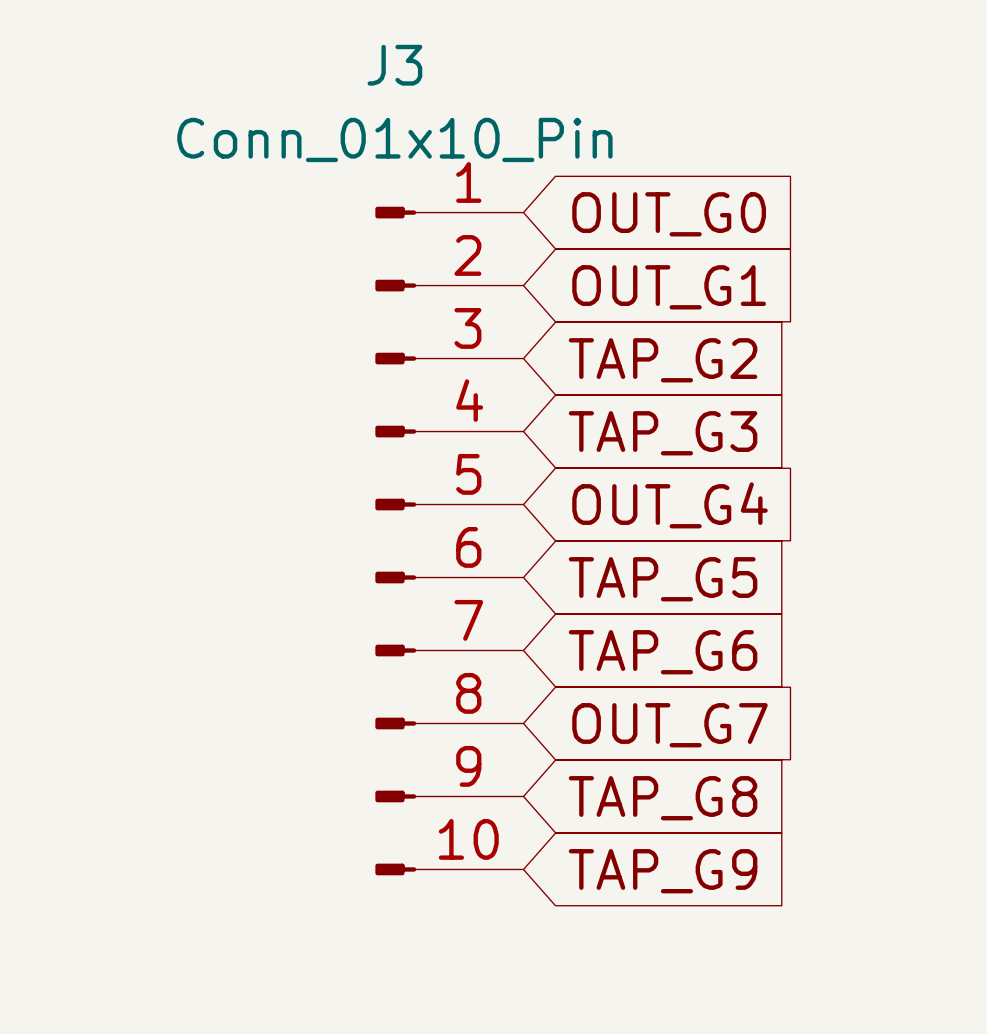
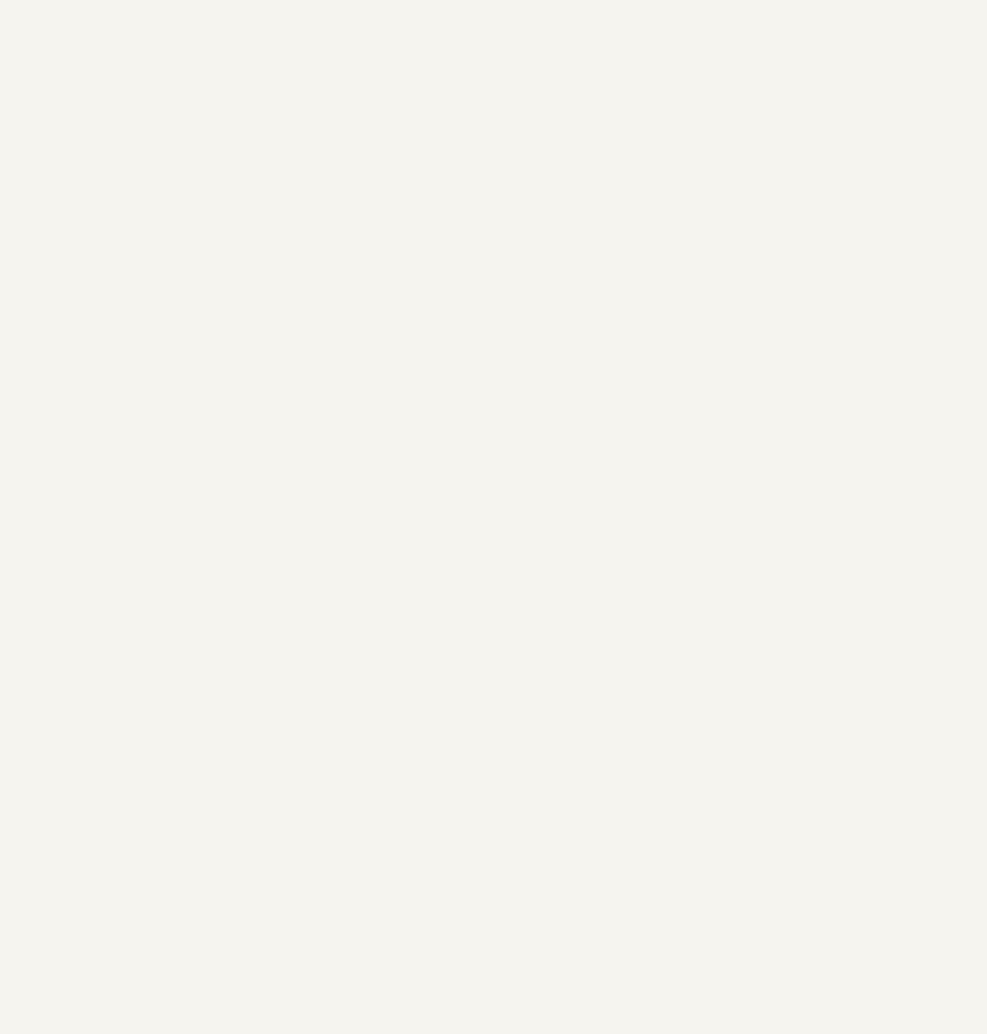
global label: OUT_G0 (669, 214) -> none
global label: OUT_G1 (669, 287) -> none
global label: TAP_G2 (663, 360) -> none
global label: TAP_G3 (663, 433) -> none
global label: OUT_G4 (669, 505) -> none
J3: Conn_01x10_Pin (449, 541) -> none
global label: TAP_G5 (663, 579) -> none
global label: TAP_G6 (663, 652) -> none
global label: OUT_G7 (669, 725) -> none
global label: TAP_G8 (663, 798) -> none
global label: TAP_G9 (663, 871) -> none

